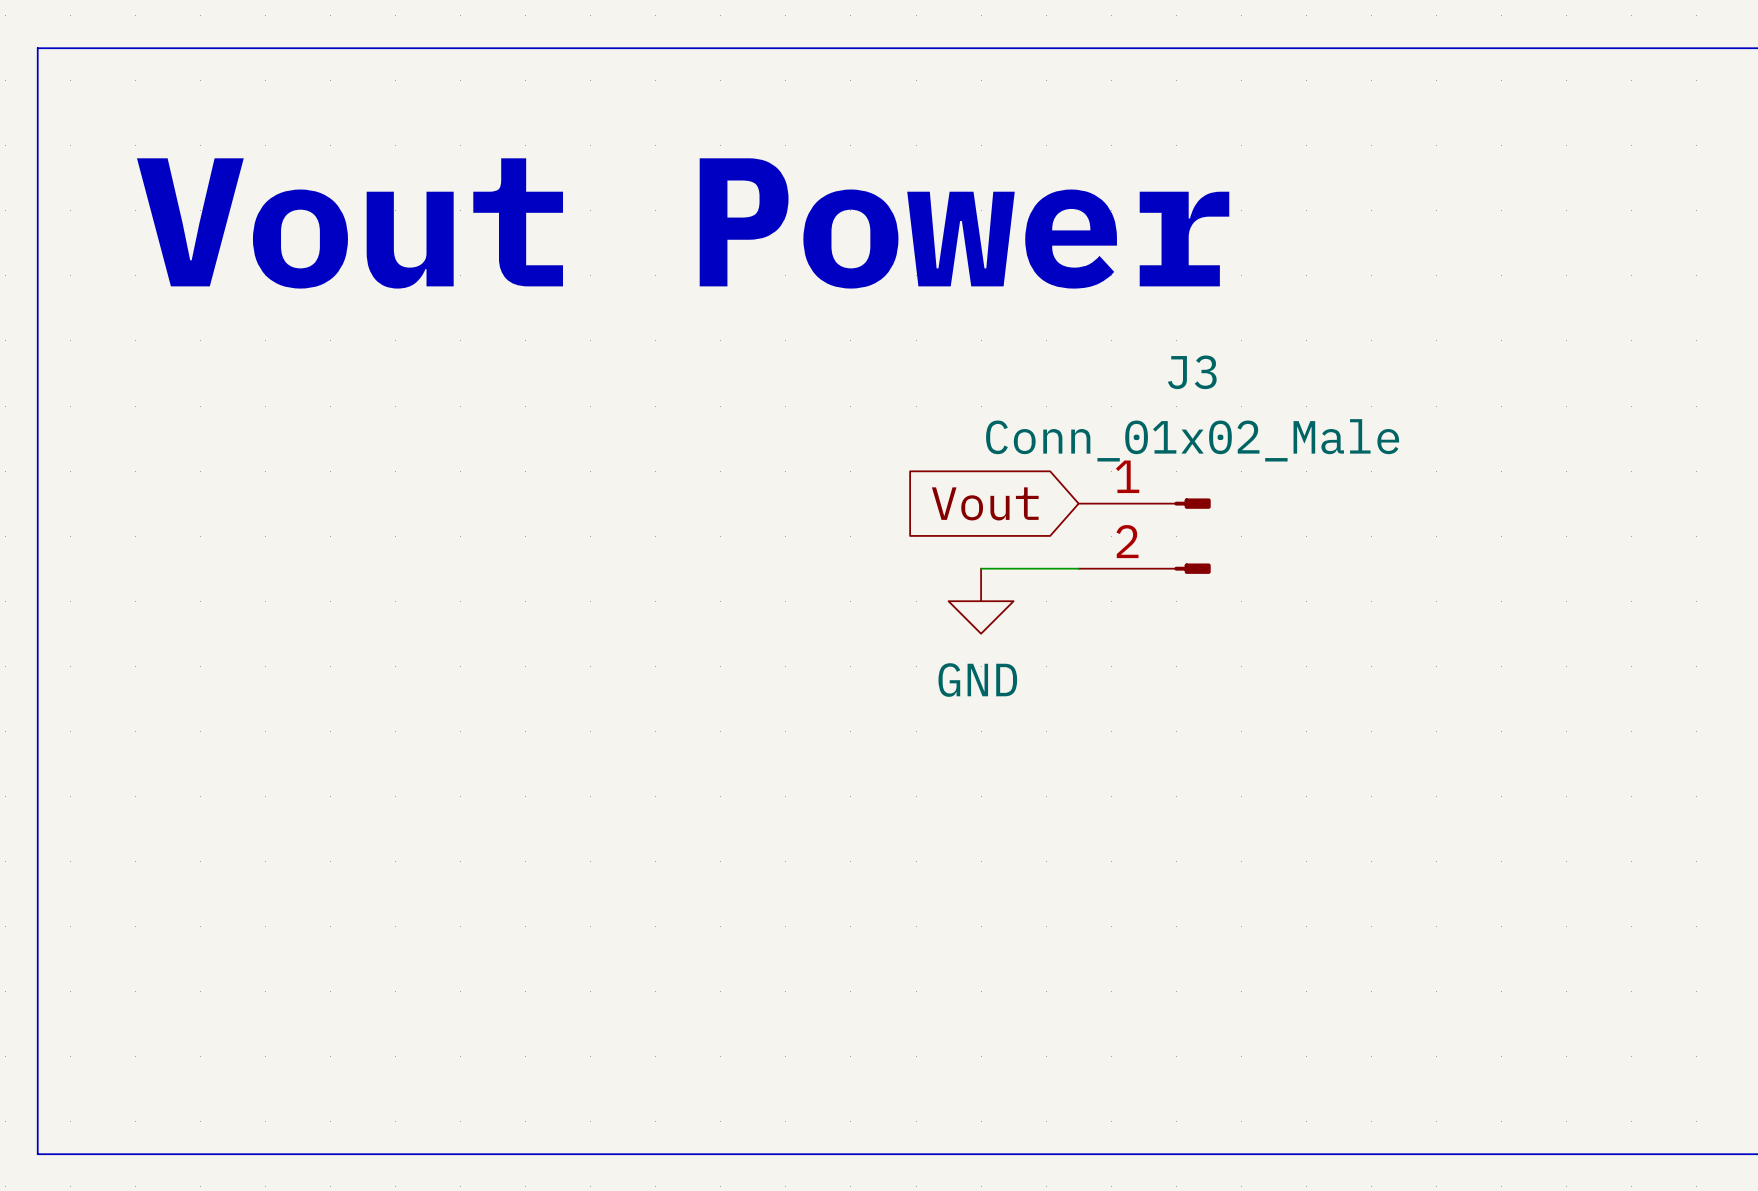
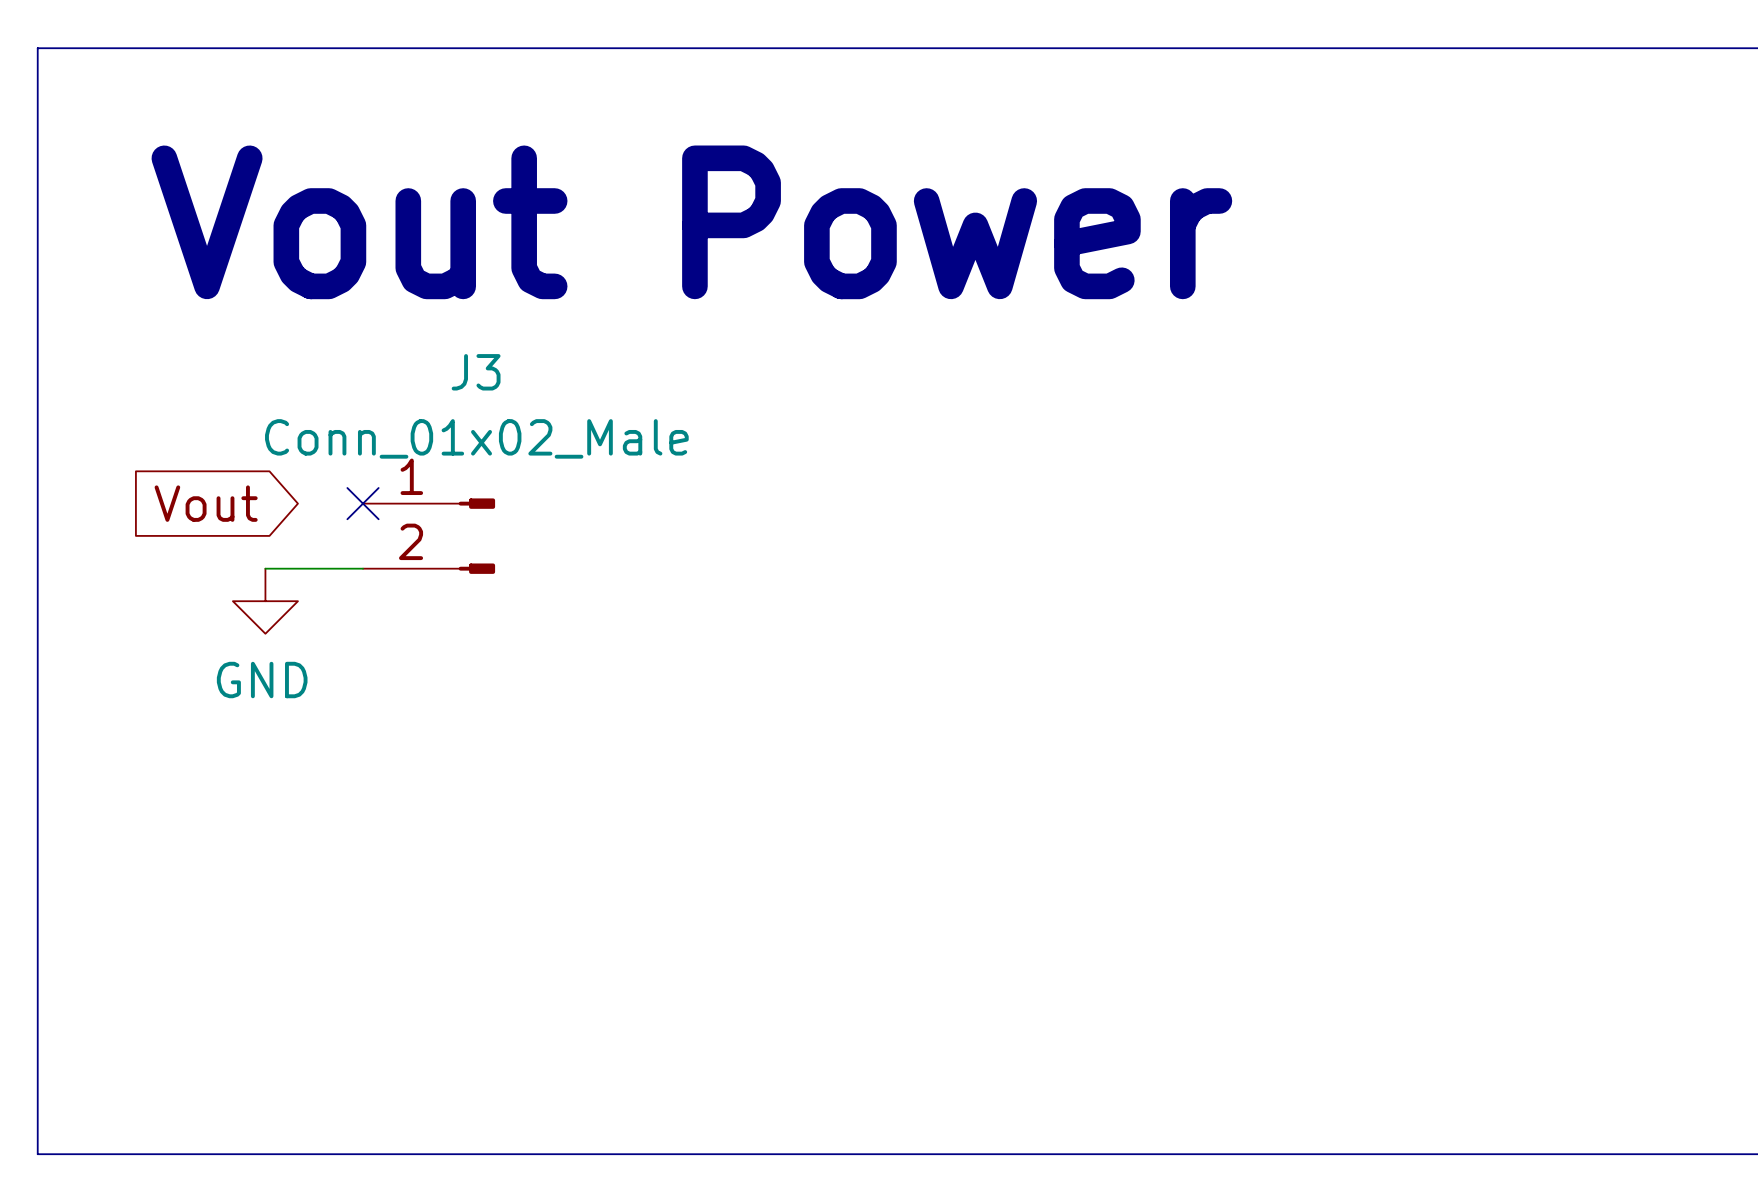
global label: none -> Vout (206, 503)
no-connect mark: none -> (363, 503)
global label: Vout (985, 503) -> none
J3 position: (1144, 536) -> (429, 536)
wire: none -> (265, 568) (363, 568)
wire: (981, 568) (1078, 568) -> none
power symbol: none -> GND (265, 601)
power symbol: GND (981, 601) -> none

